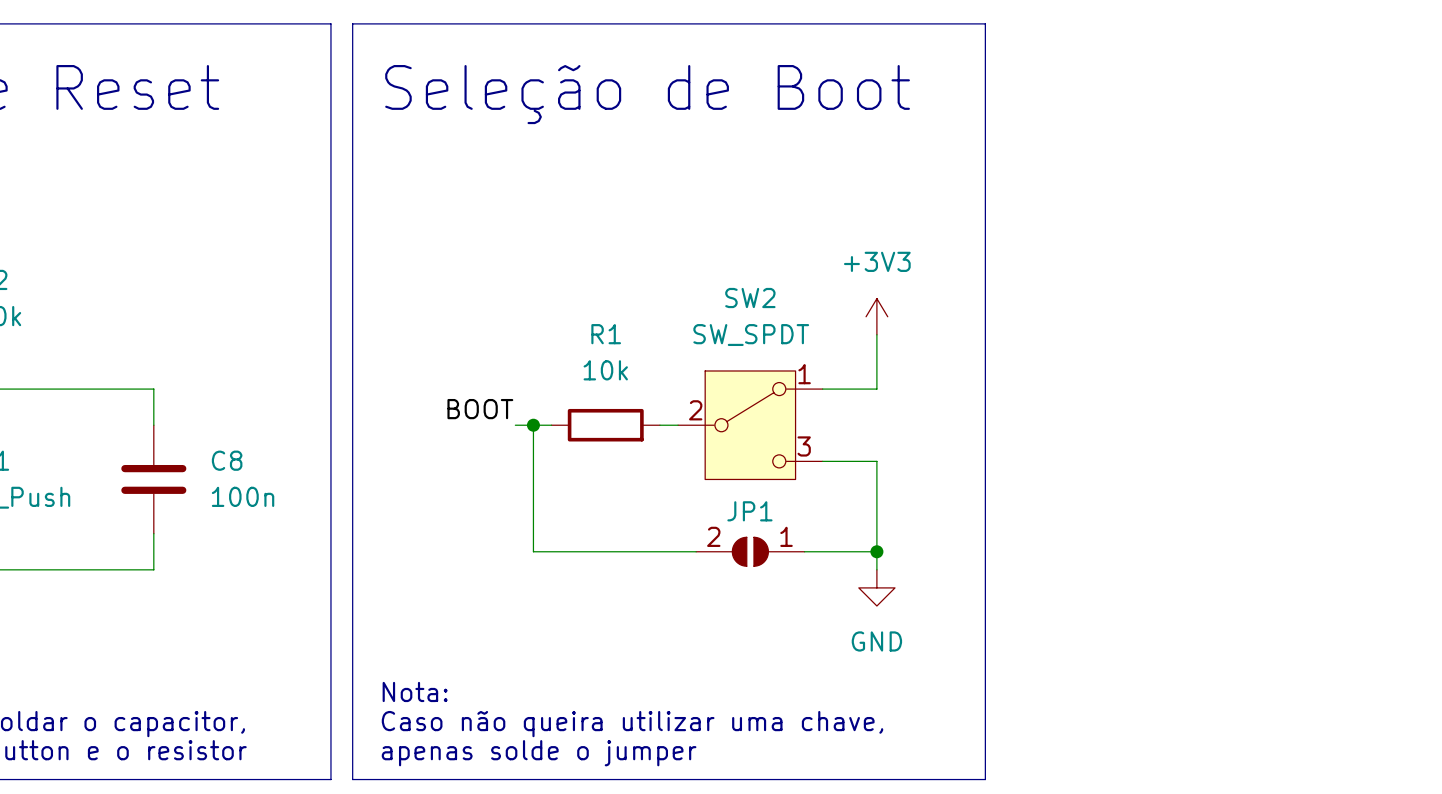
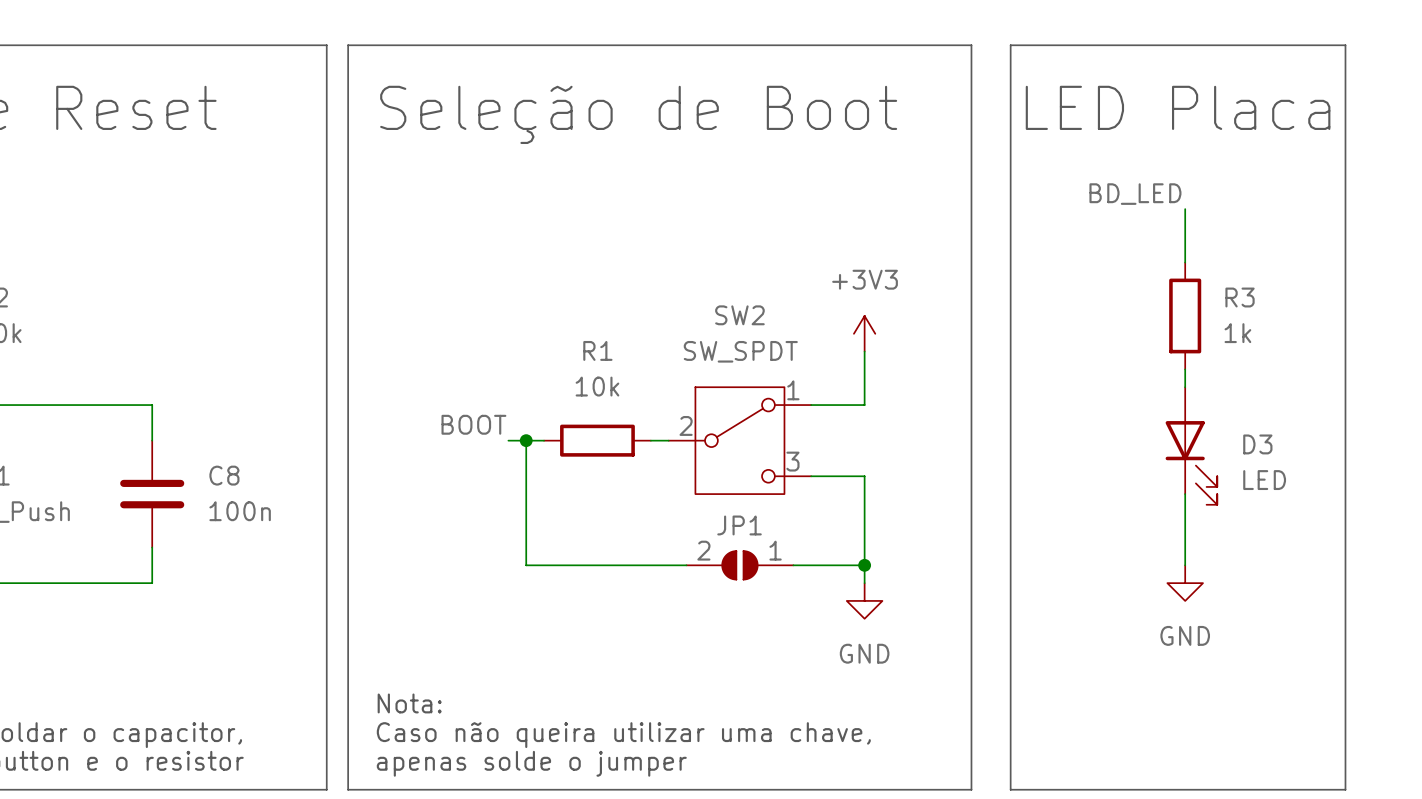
line: none -> (1010, 45) (1345, 45) (1345, 789) (1010, 789) (1010, 45)
text: none -> LED Placa (1178, 107)
label: none -> BD_LED (1135, 194)
wire: none -> (1185, 209) (1185, 262)
R3: none -> 1k (1185, 315)
wire: none -> (1185, 369) (1185, 387)
D3: none -> LED (1191, 446)
wire: none -> (1185, 494) (1185, 565)
power symbol: none -> GND (1185, 583)

